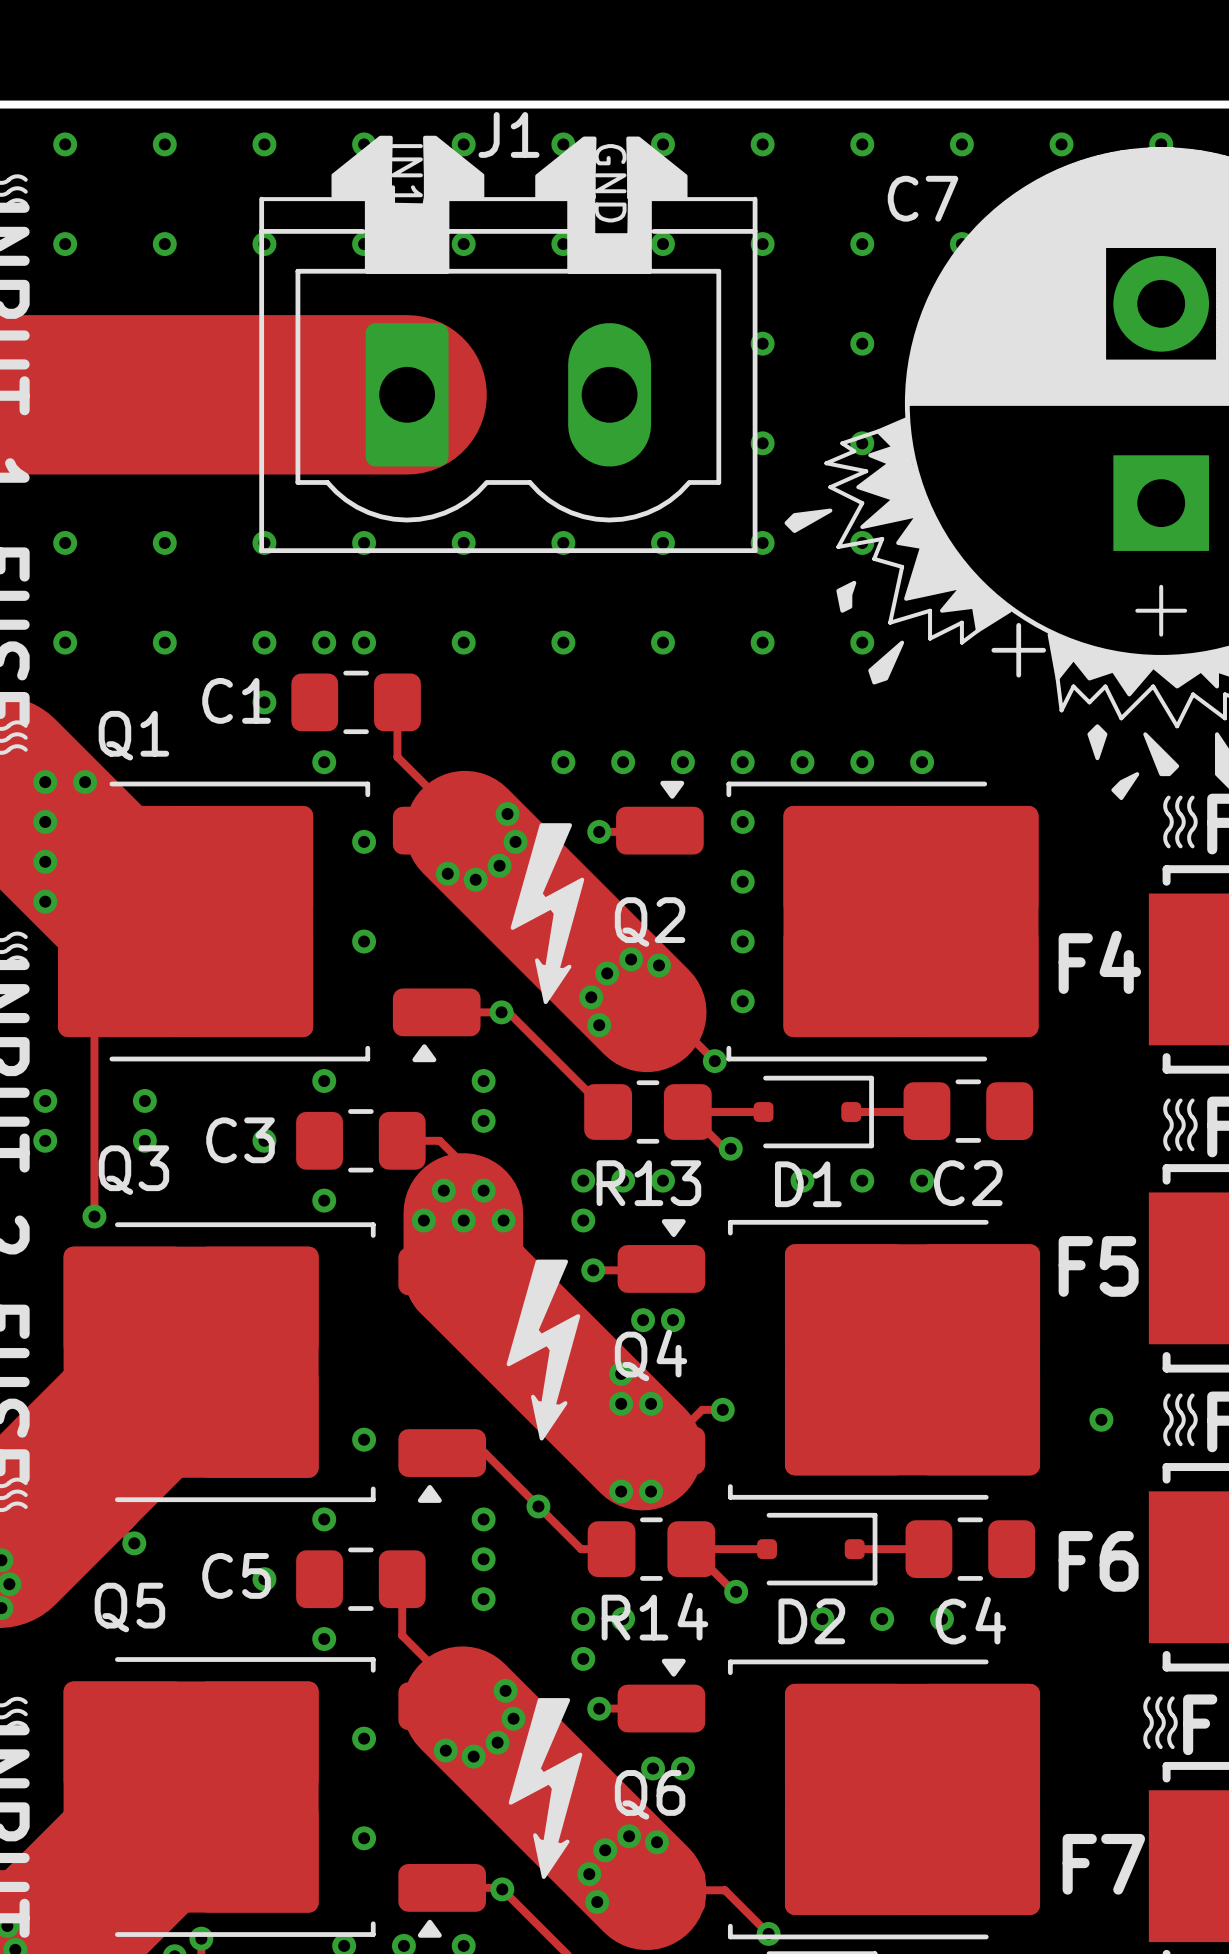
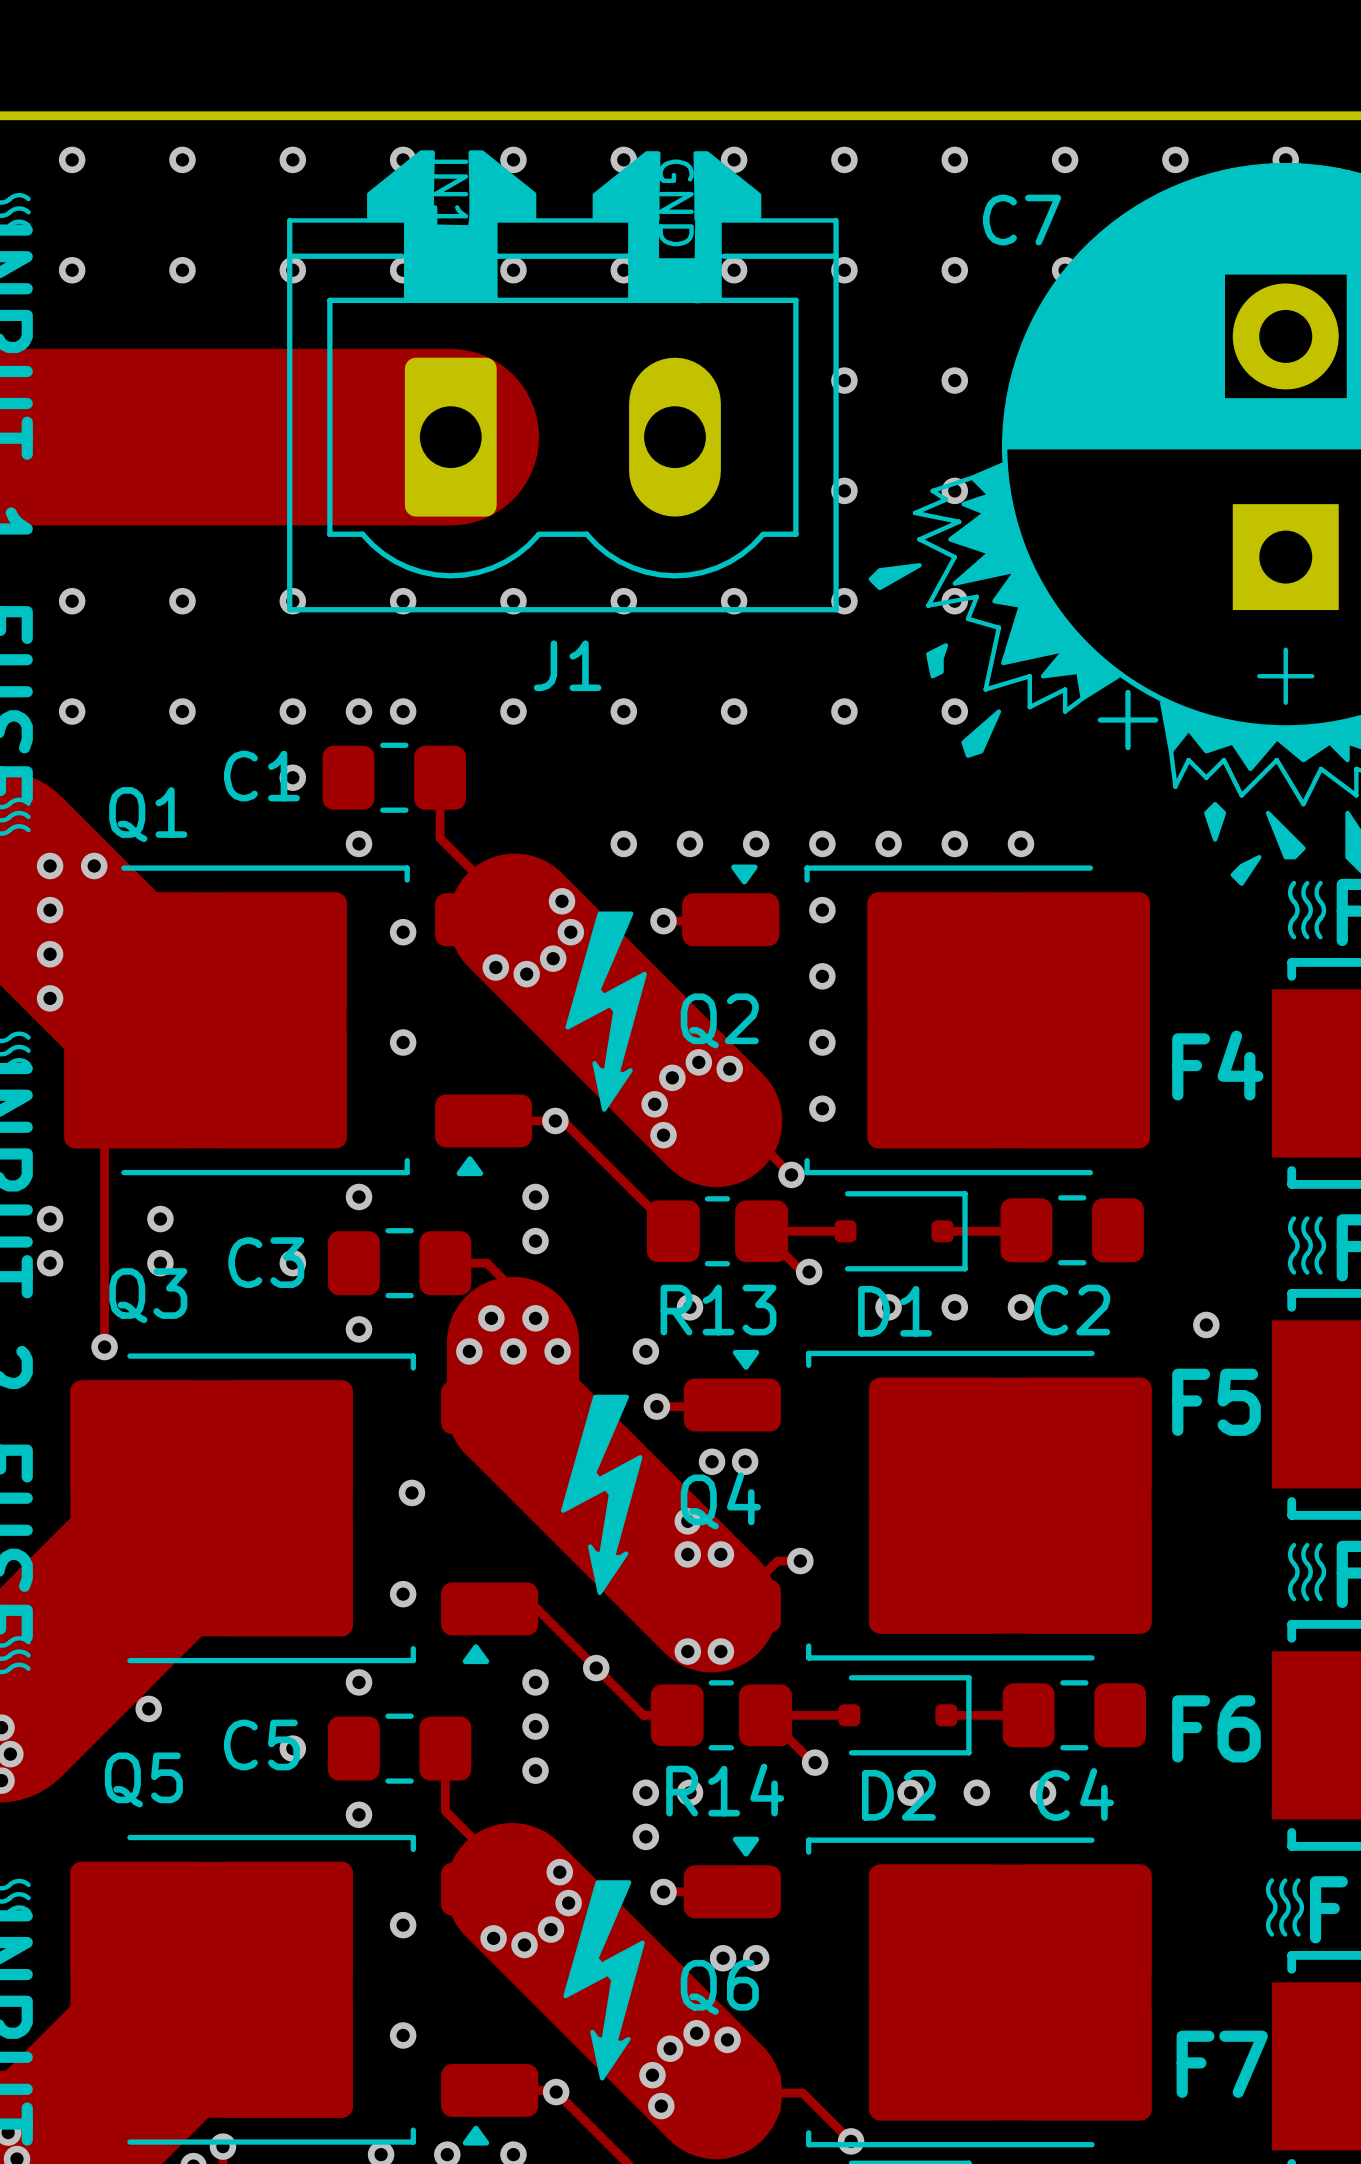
J1 name position: J1 (509, 134) -> J1 (567, 665)
via: (583, 1180) -> none
via: (663, 1180) -> none
via: none -> (1206, 1324)
via: none -> (411, 1492)
via: (1101, 1419) -> none

